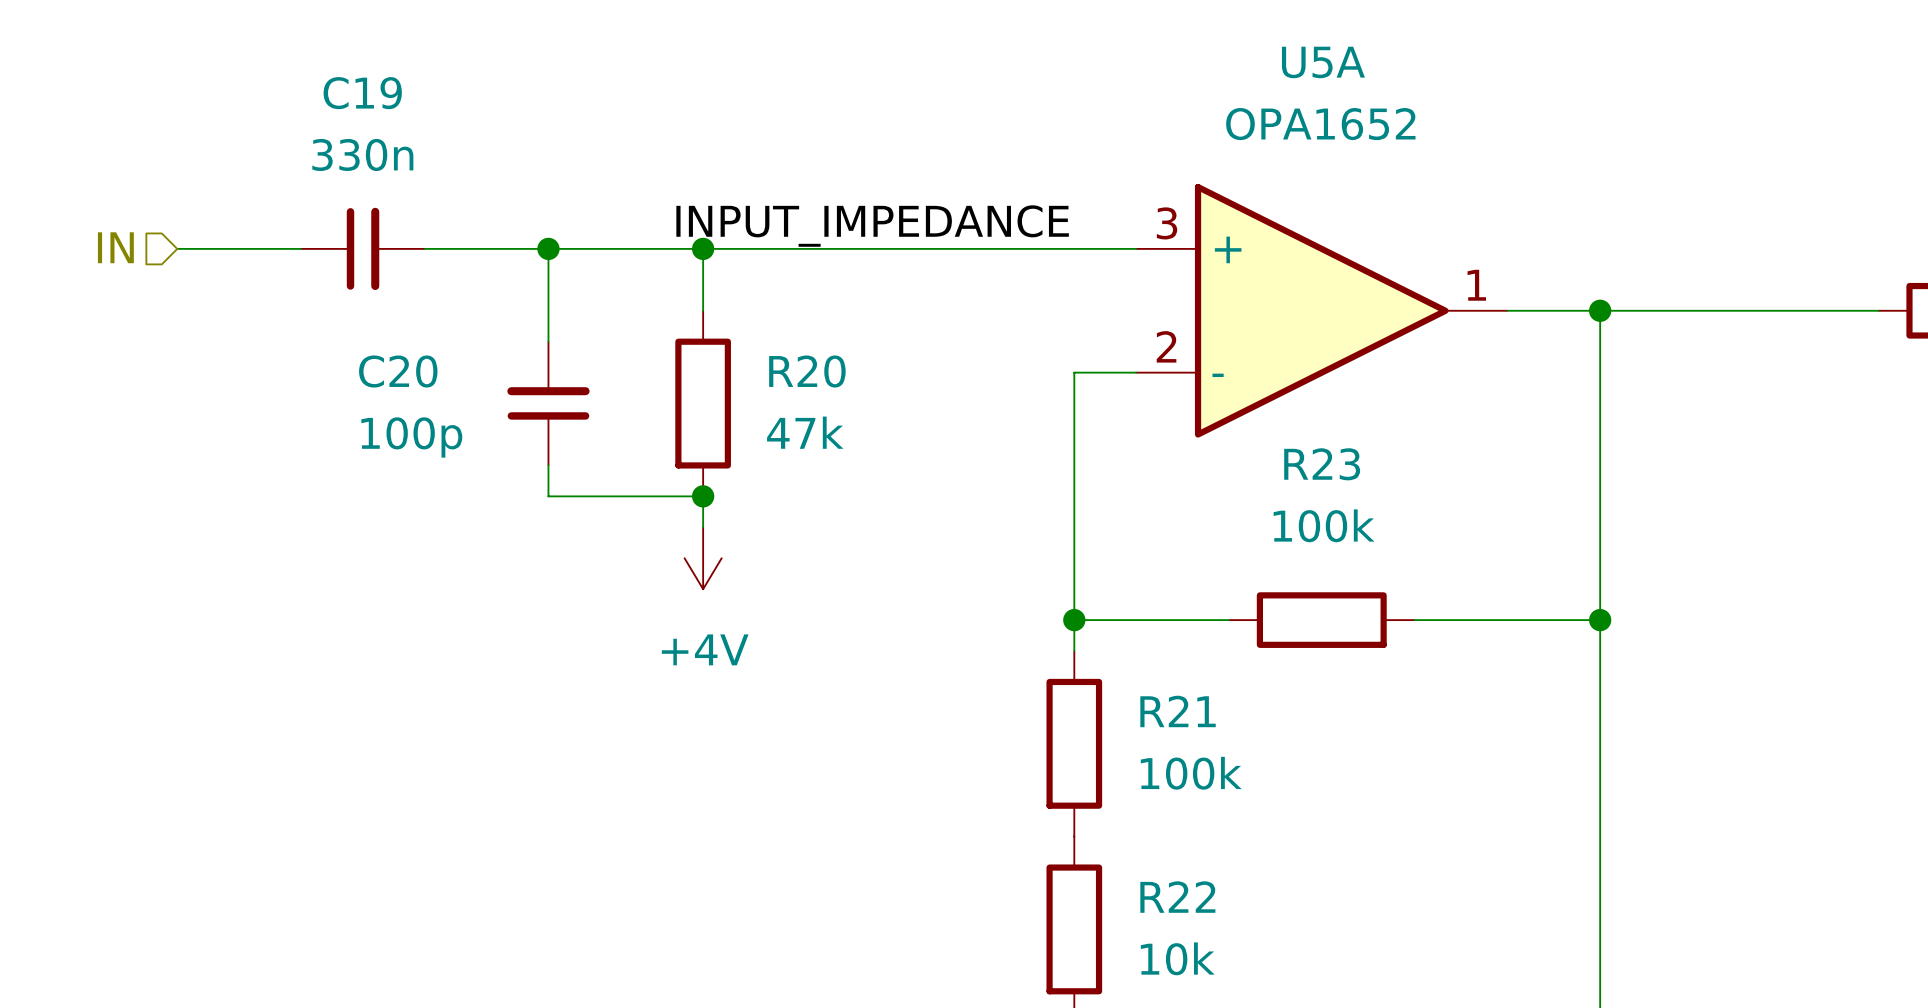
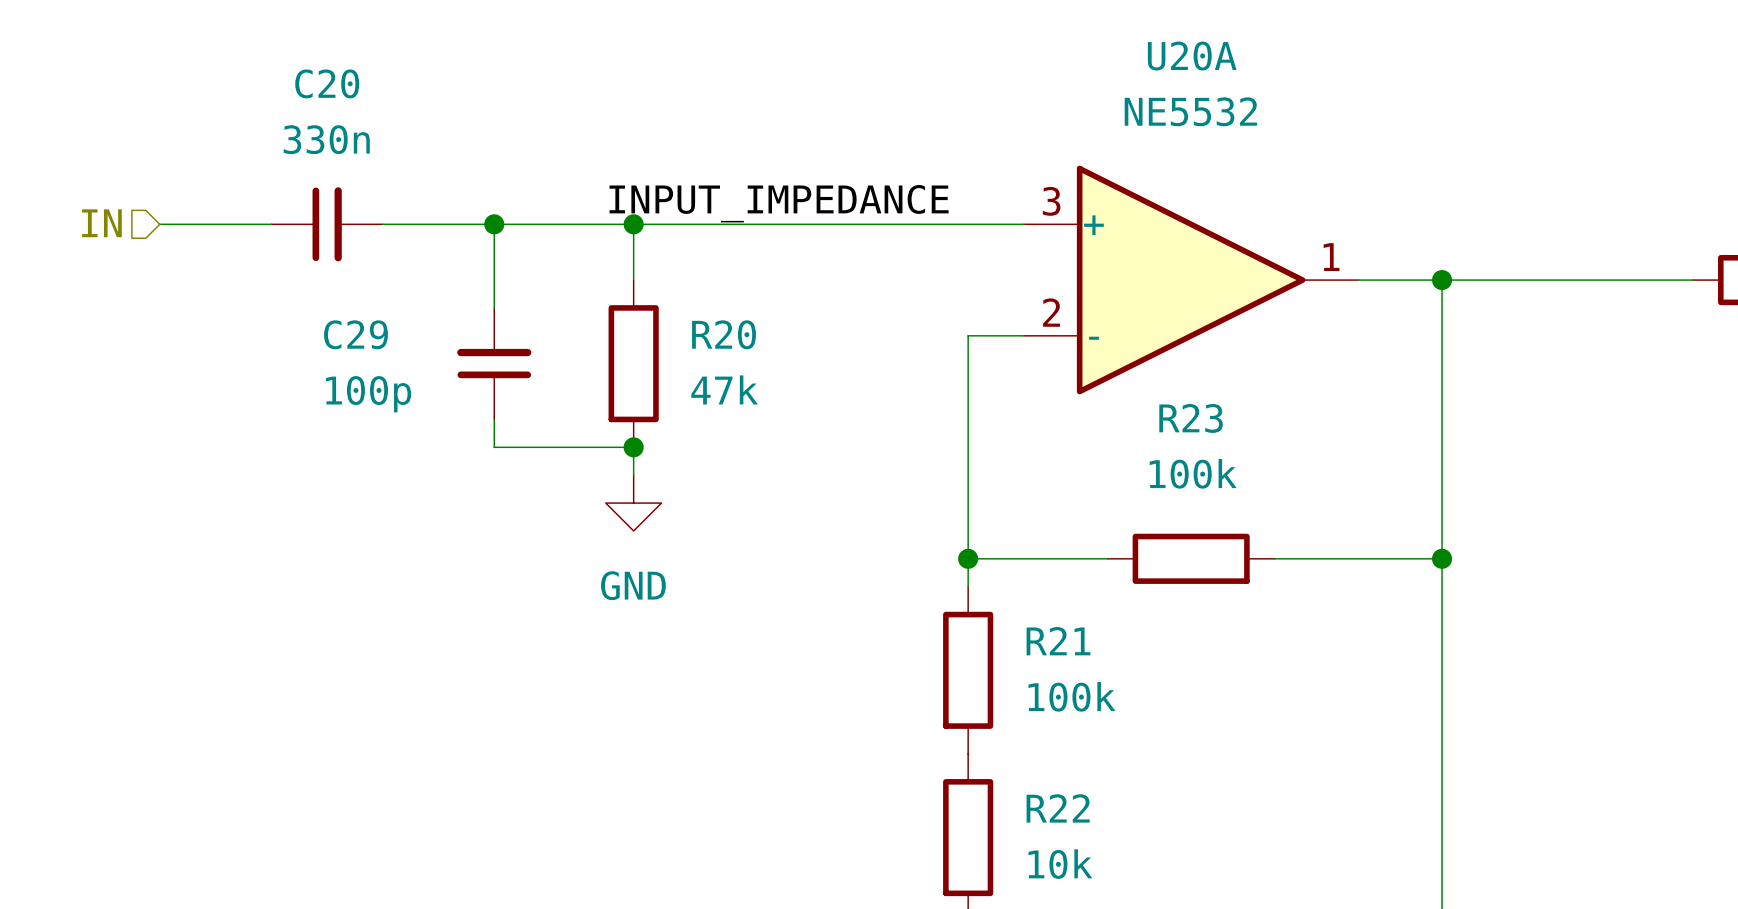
C19 name: C19 (362, 93) -> C20 (327, 83)
U5A: OPA1652 (1321, 310) -> none
U20A: none -> NE5532 (1191, 280)
C20 name: C20 (398, 371) -> C29 (355, 334)
power symbol: +4V (703, 558) -> GND (633, 503)

